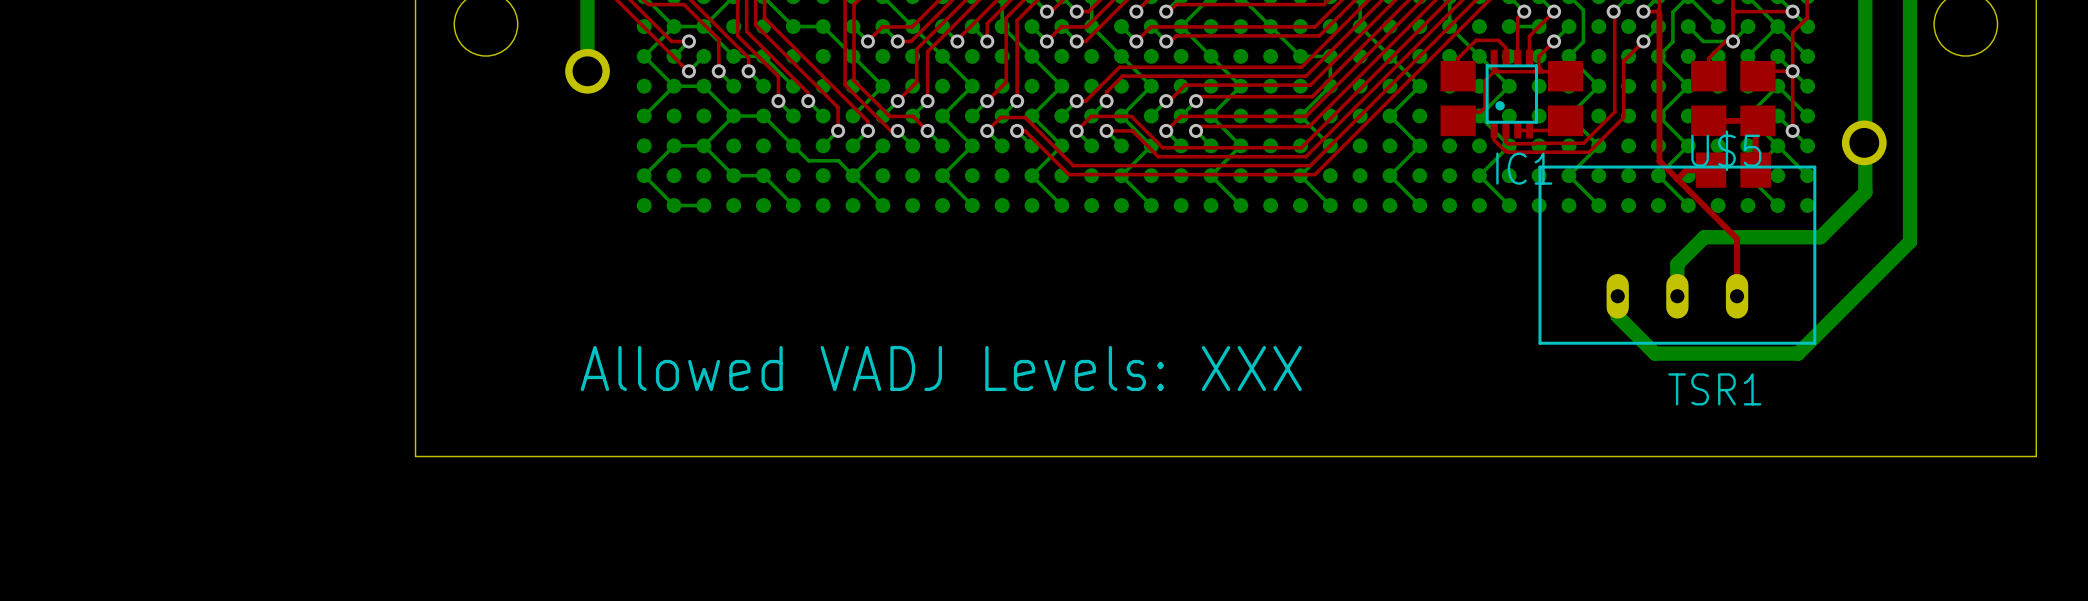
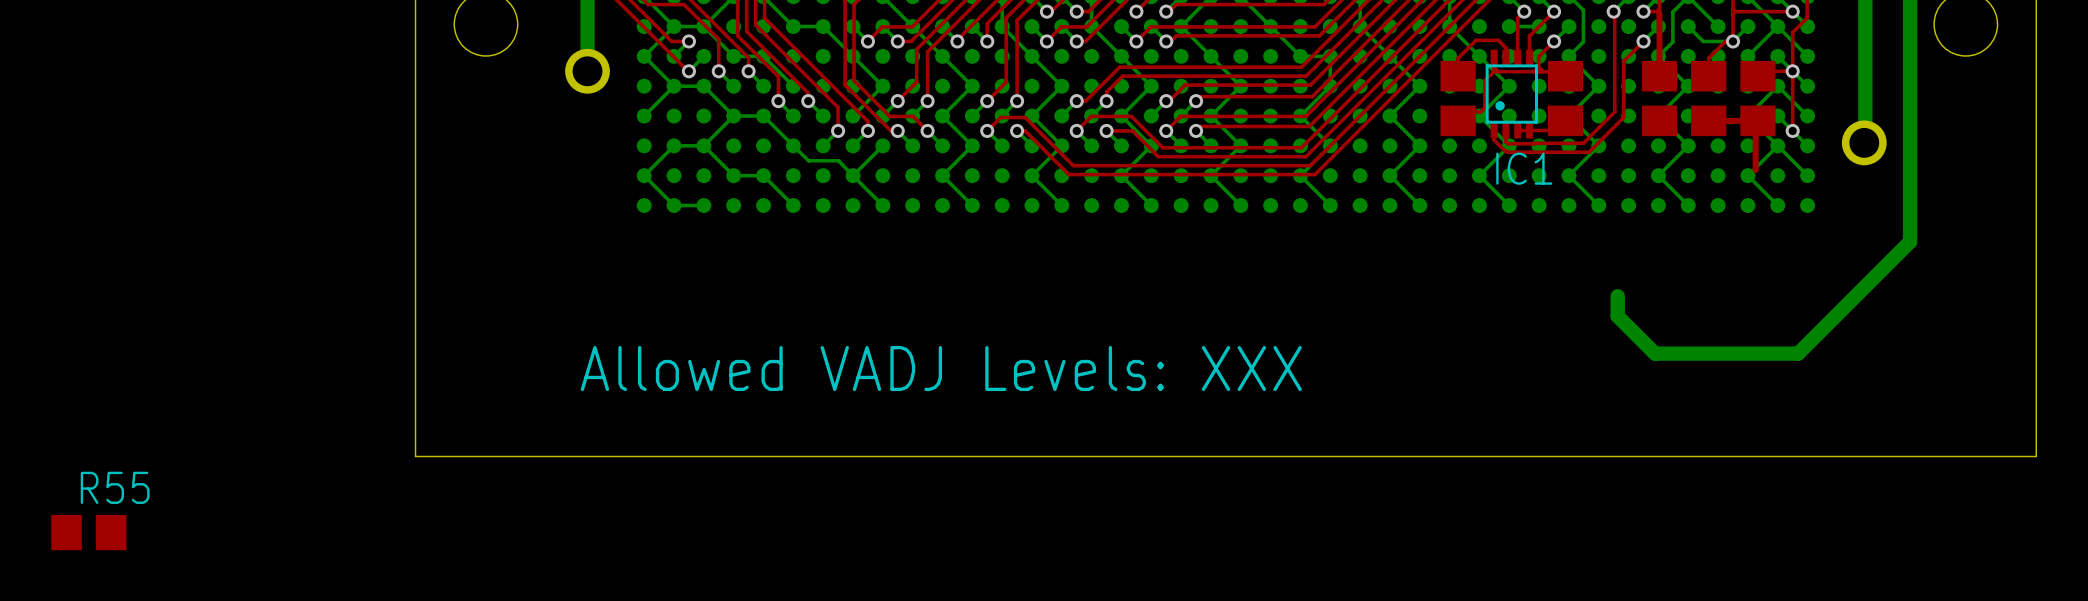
top track: (1659, 76) (1659, 161) (1737, 238) (1737, 296) -> none
bottom track: (1865, 141) (1865, 192) (1820, 237) (1704, 237) (1677, 264) (1677, 296) -> none
top track: (1711, 170) (1686, 170) (1677, 179) -> none
part rotation: 0° (1733, 170) -> 90° clockwise (1659, 98)
part position: (1733, 170) -> (1659, 98)
U$5: TSR1 (1677, 255) -> none
R55: none -> (88, 532)

